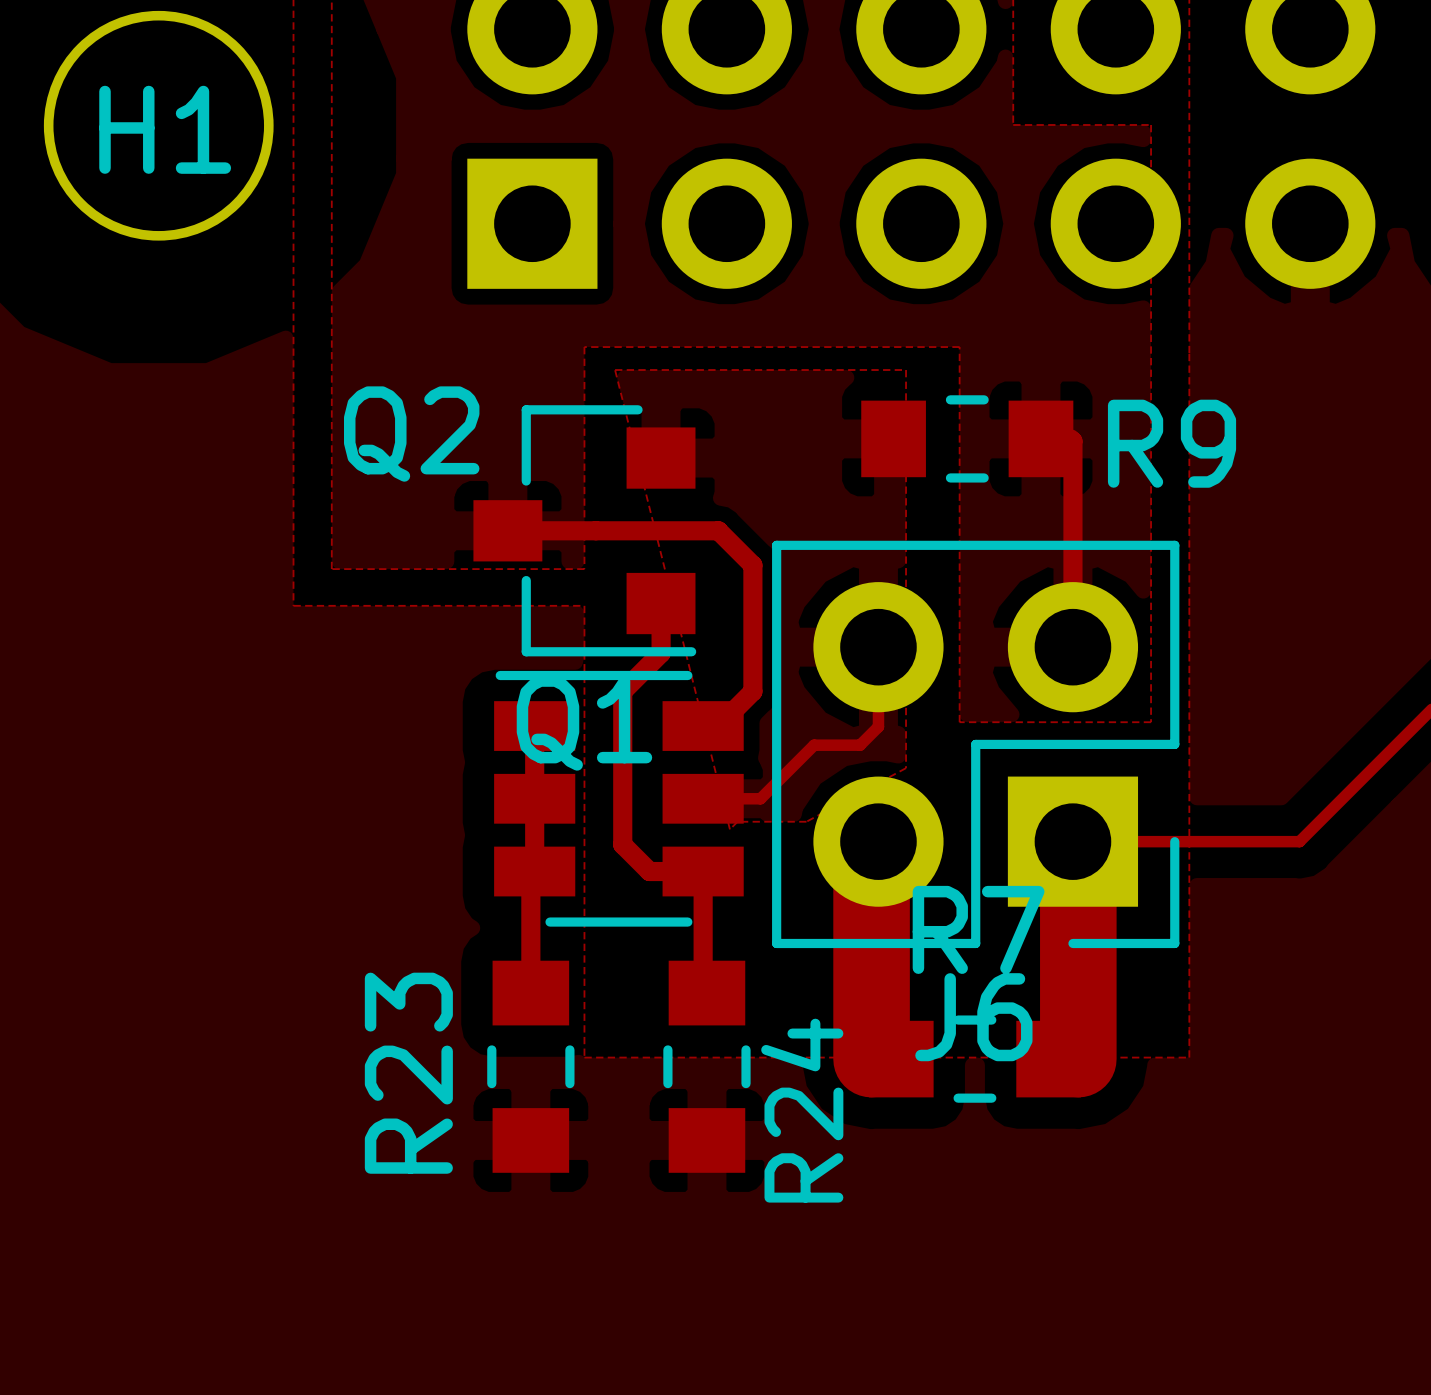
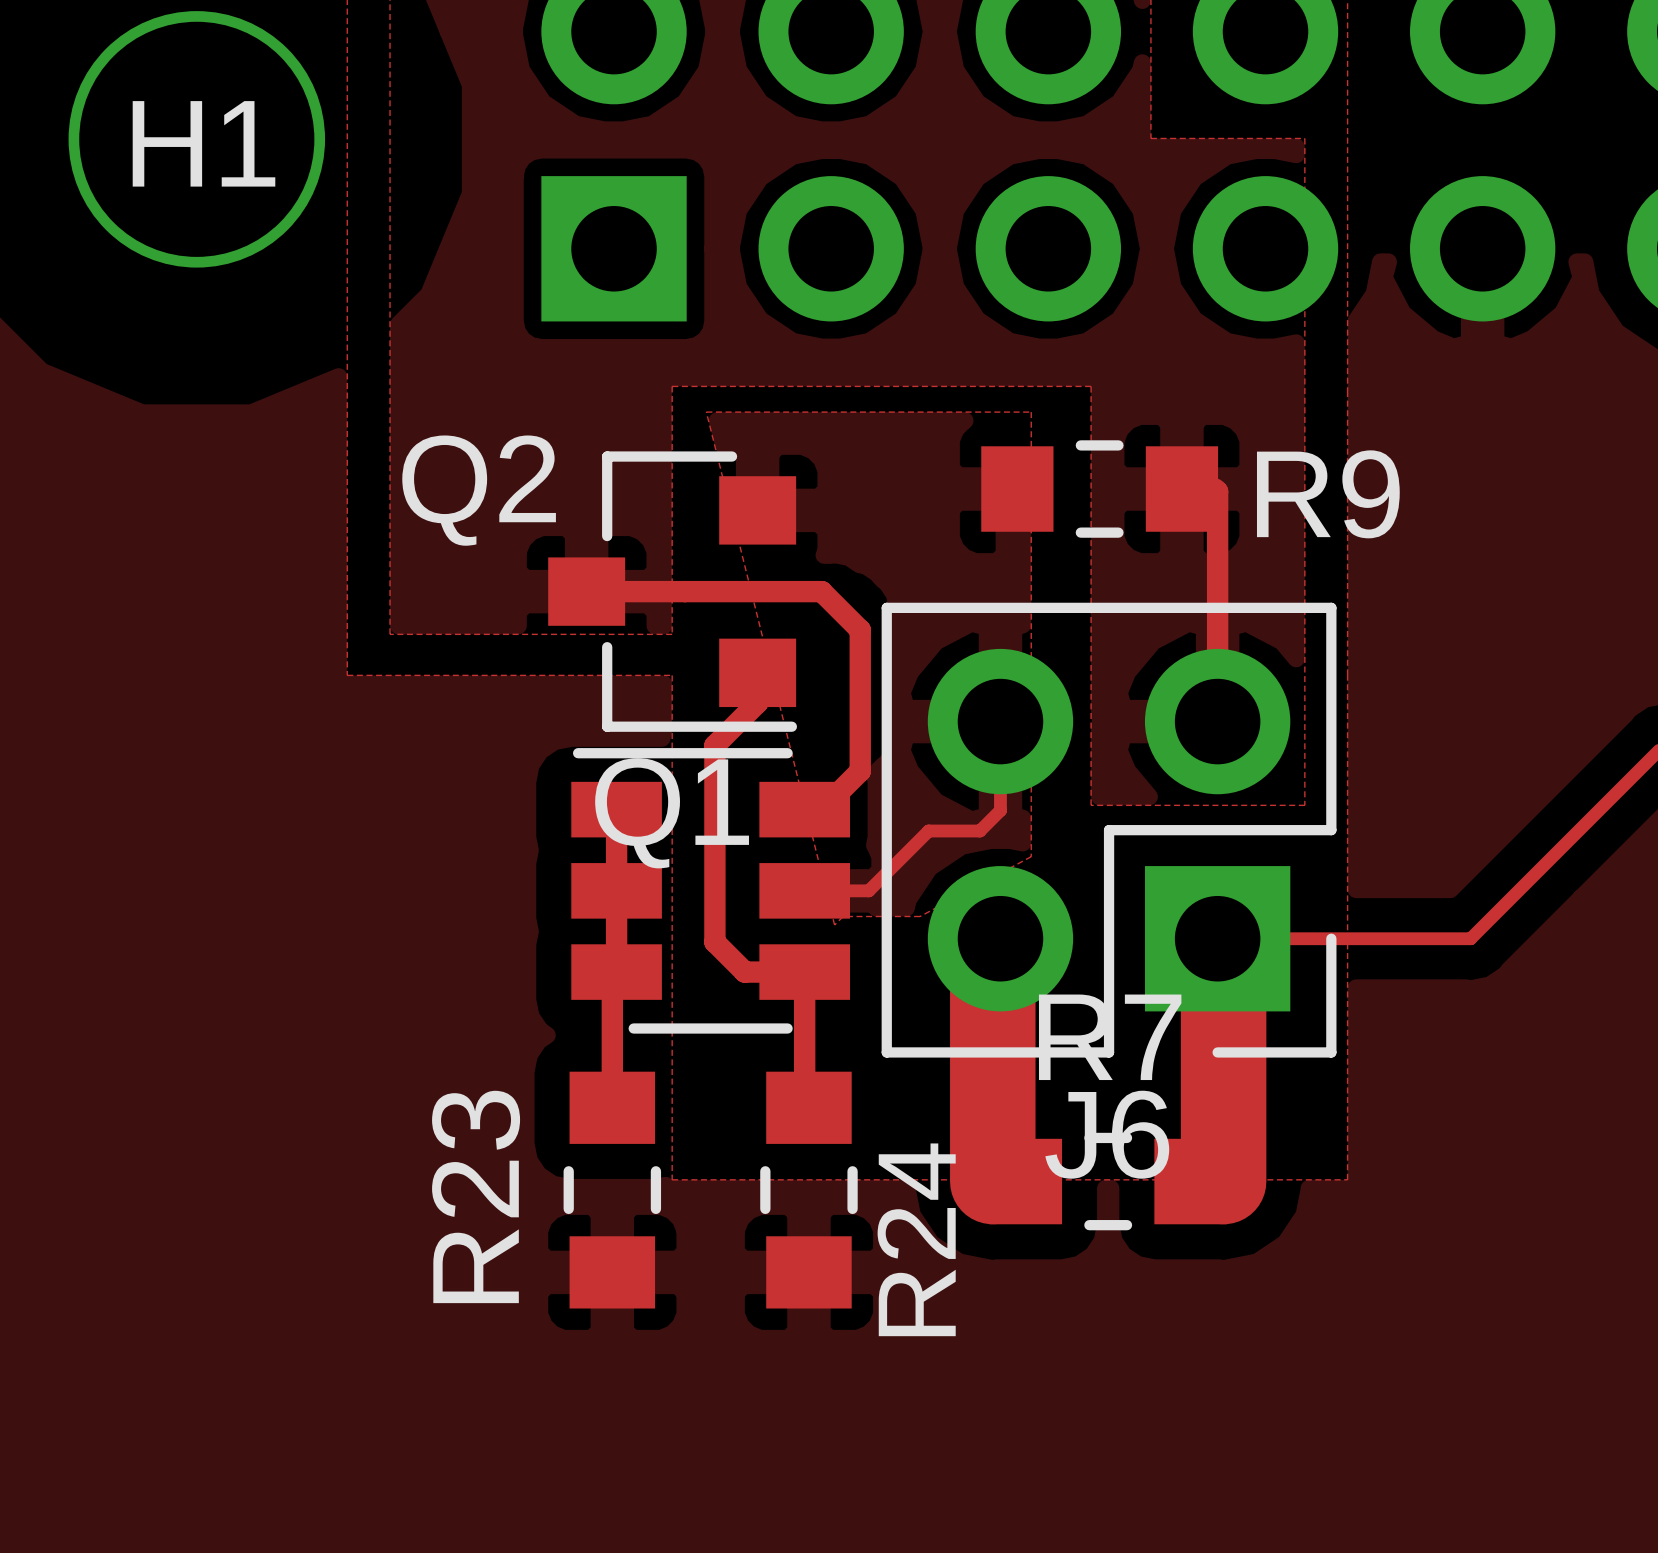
track: (661, 630) (661, 653) (622, 691) -> (757, 702) (714, 745) (714, 771)

